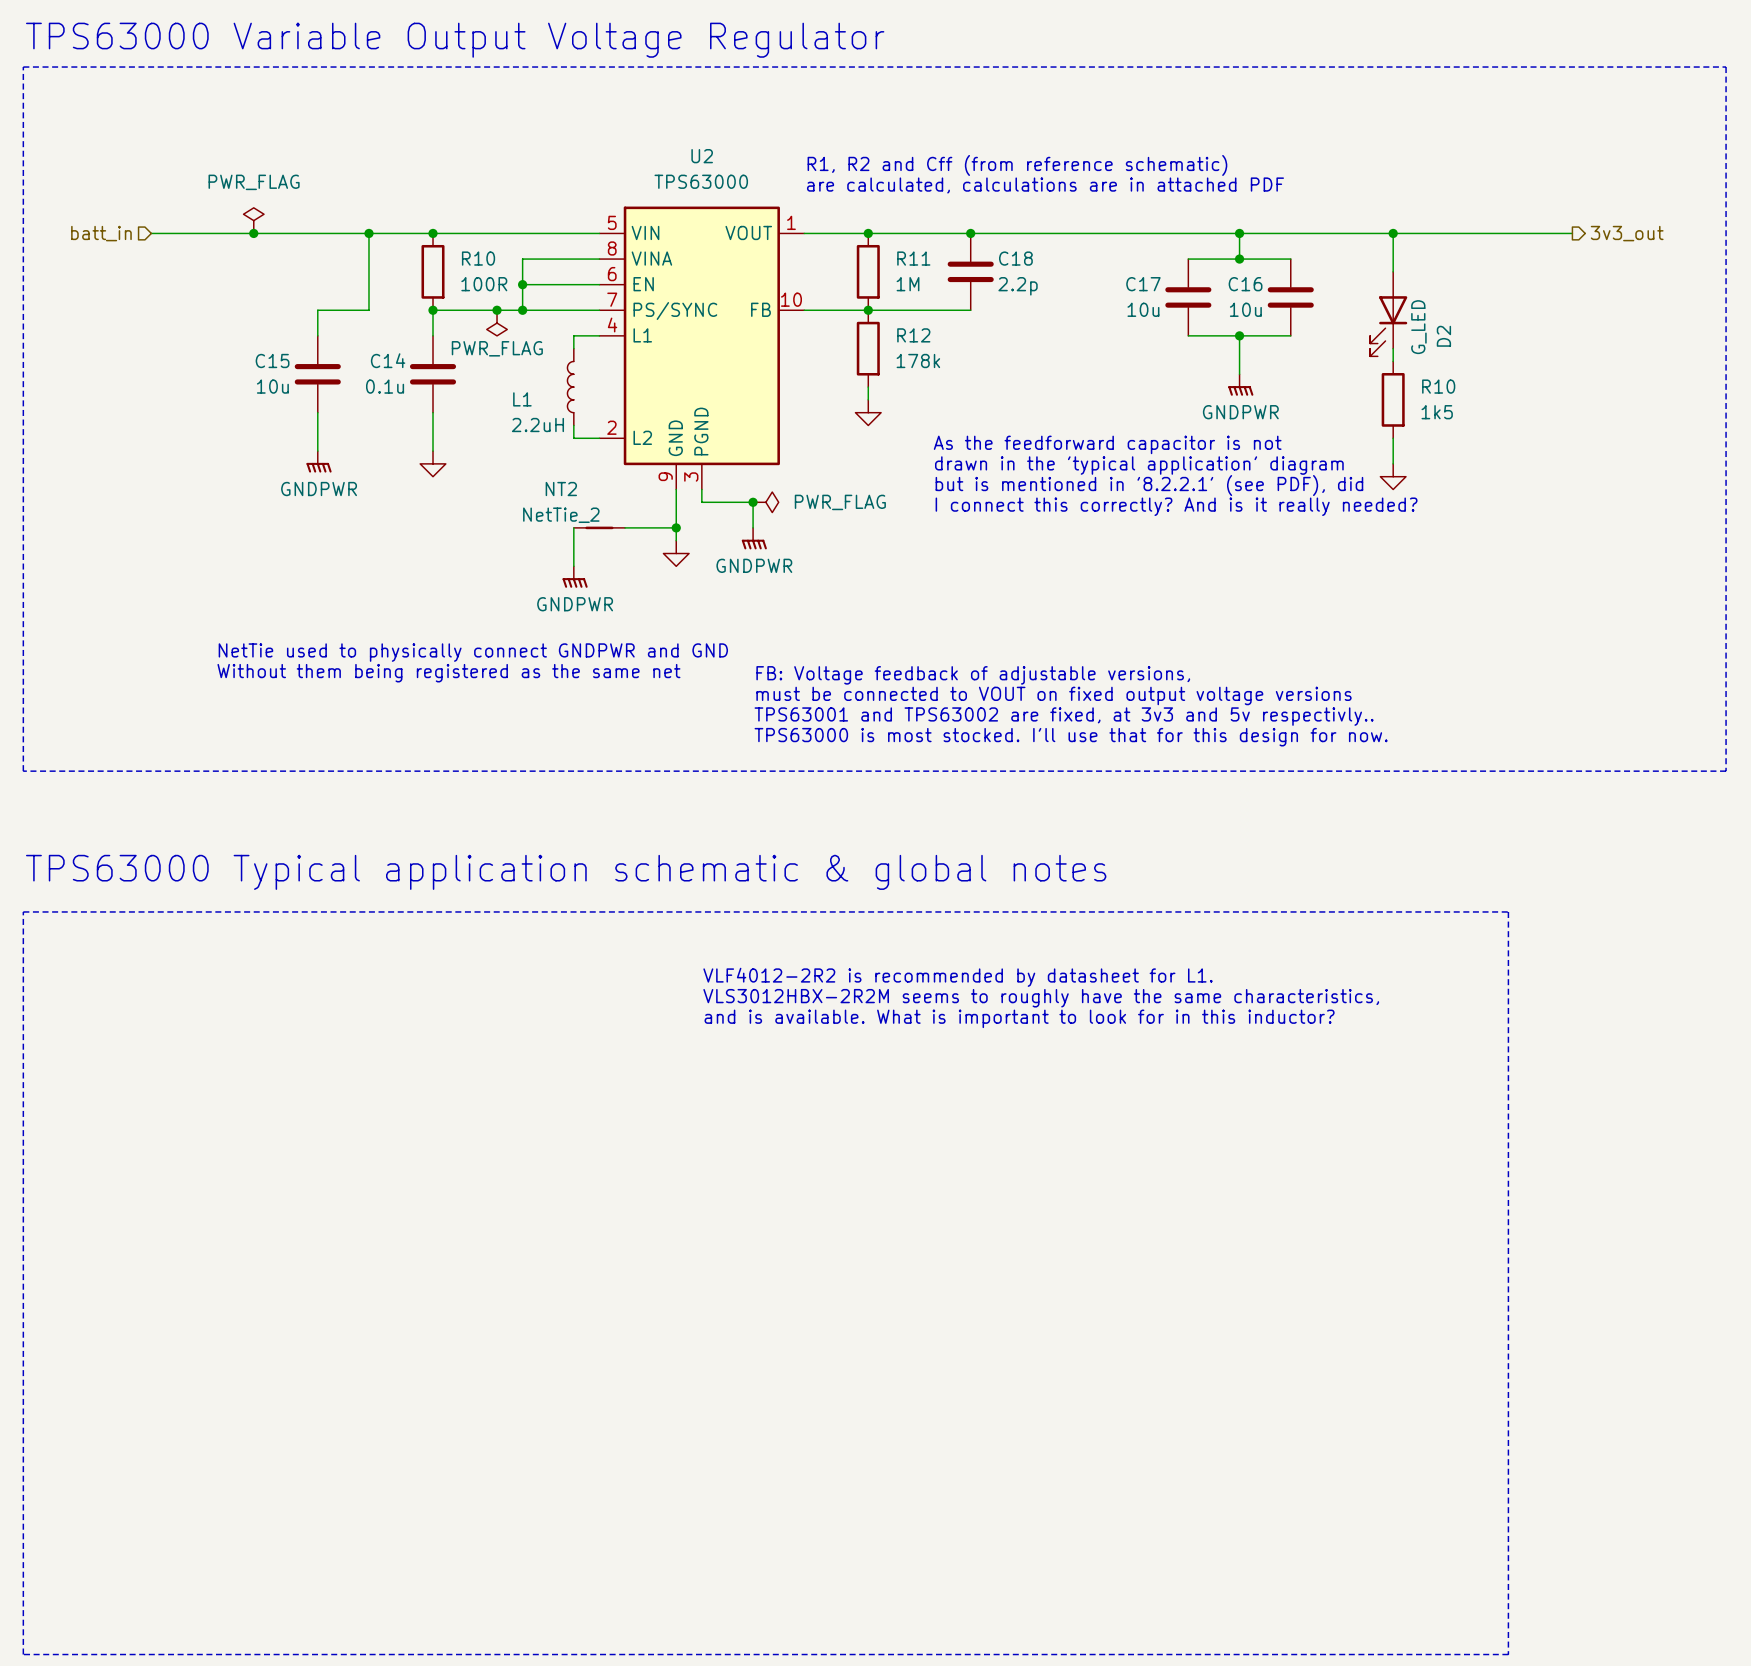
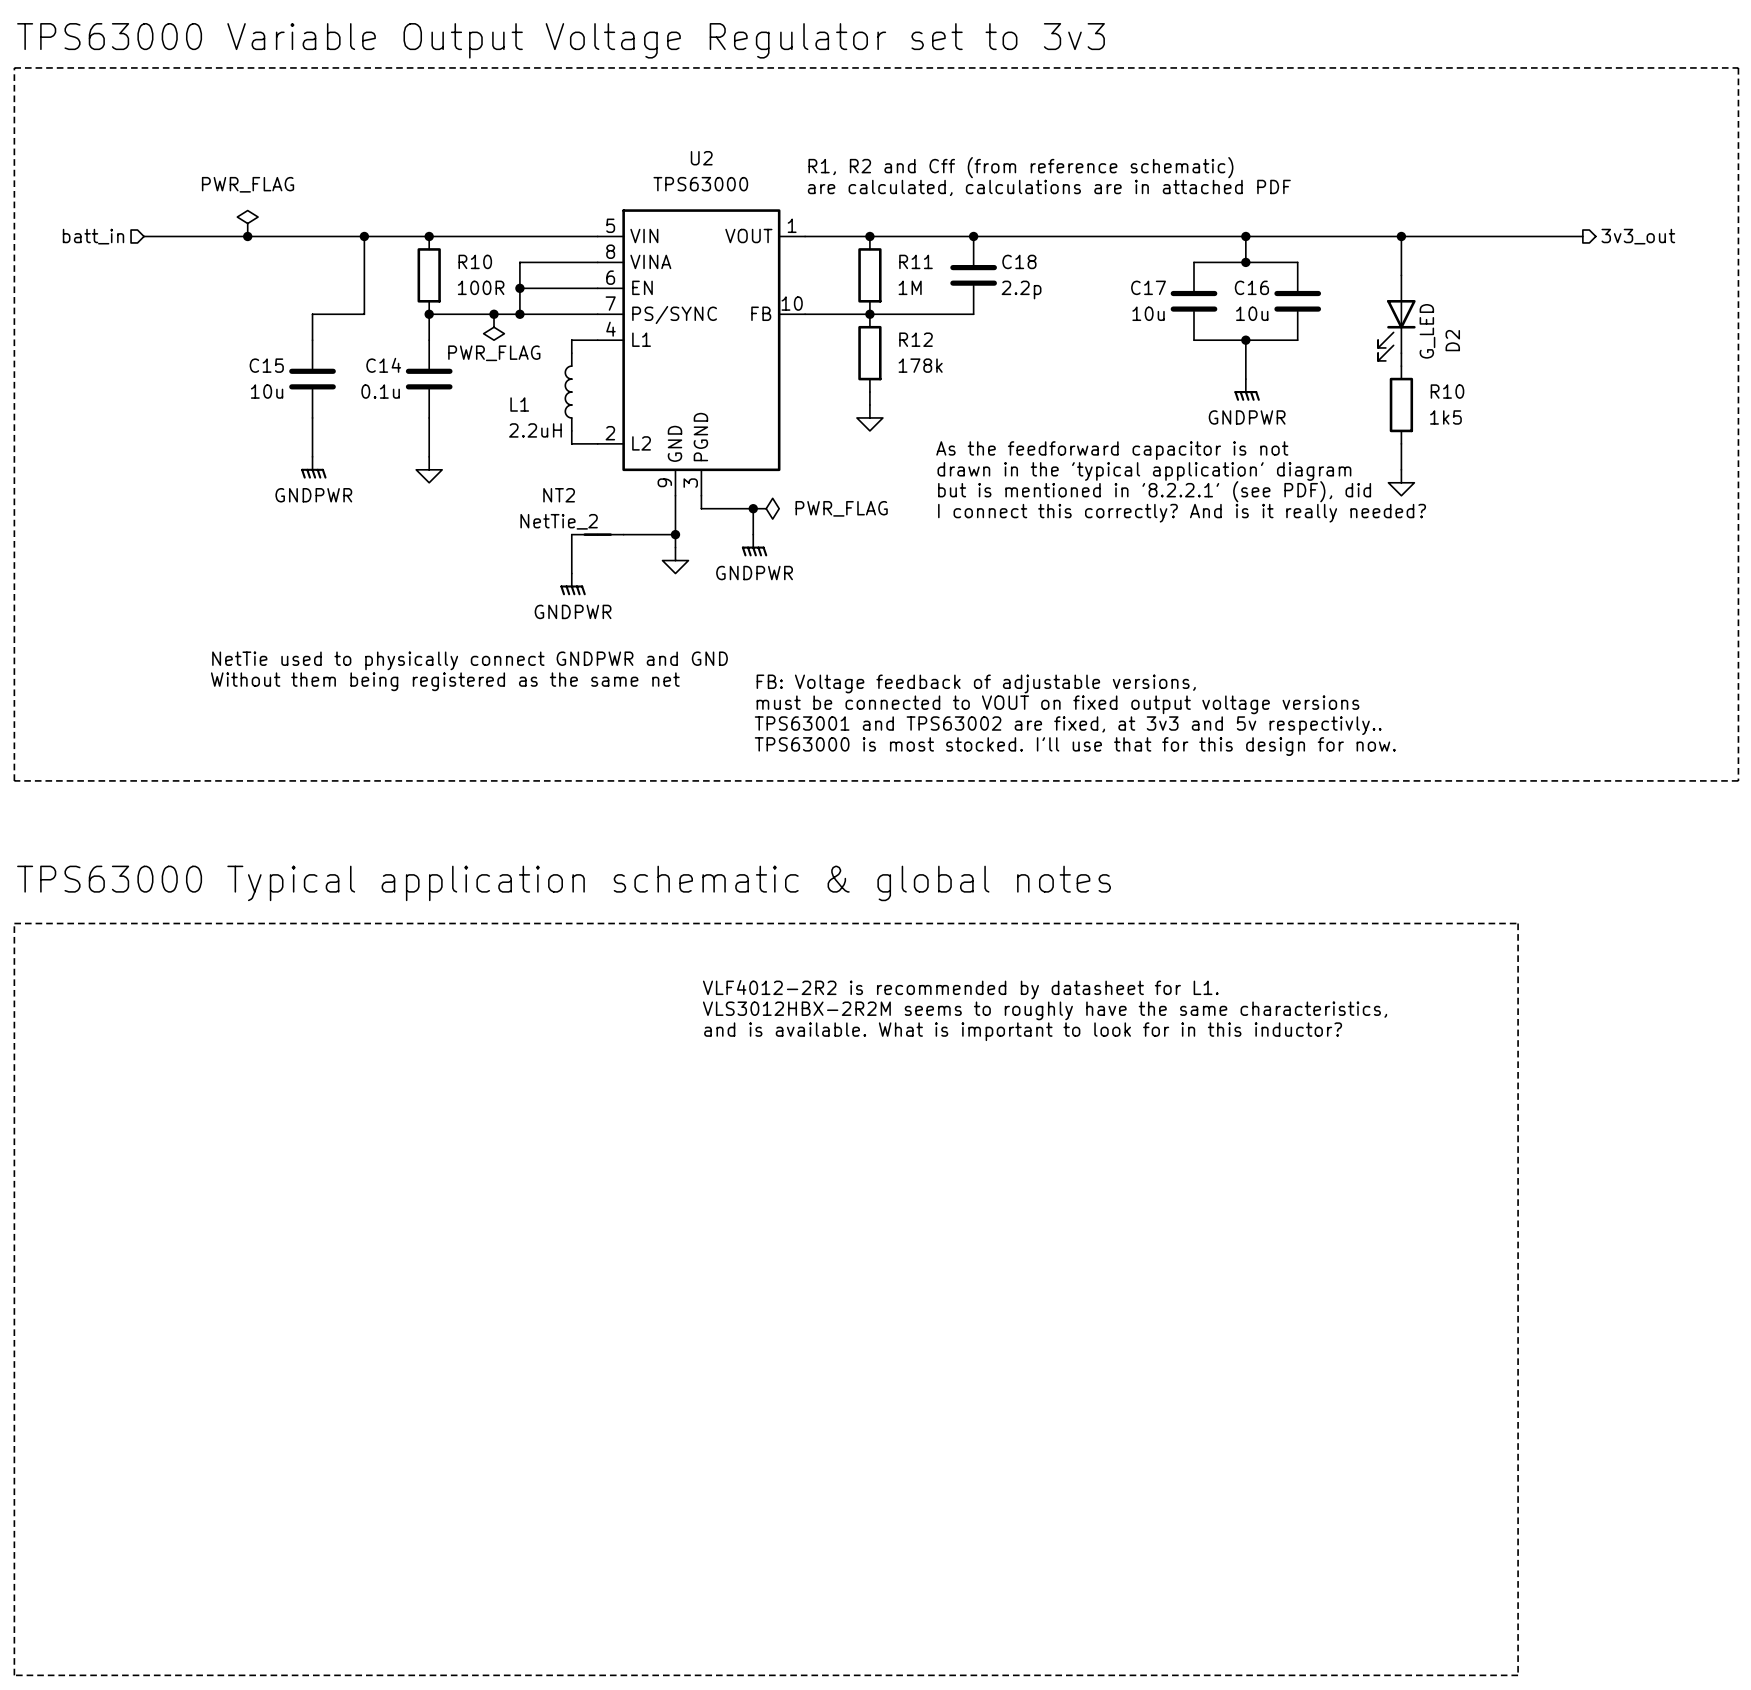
text: TPS63000 Variable Output Voltage Regulator (455, 40) -> TPS63000 Variable Output Voltage Regulator set to 3v3 (560, 40)

